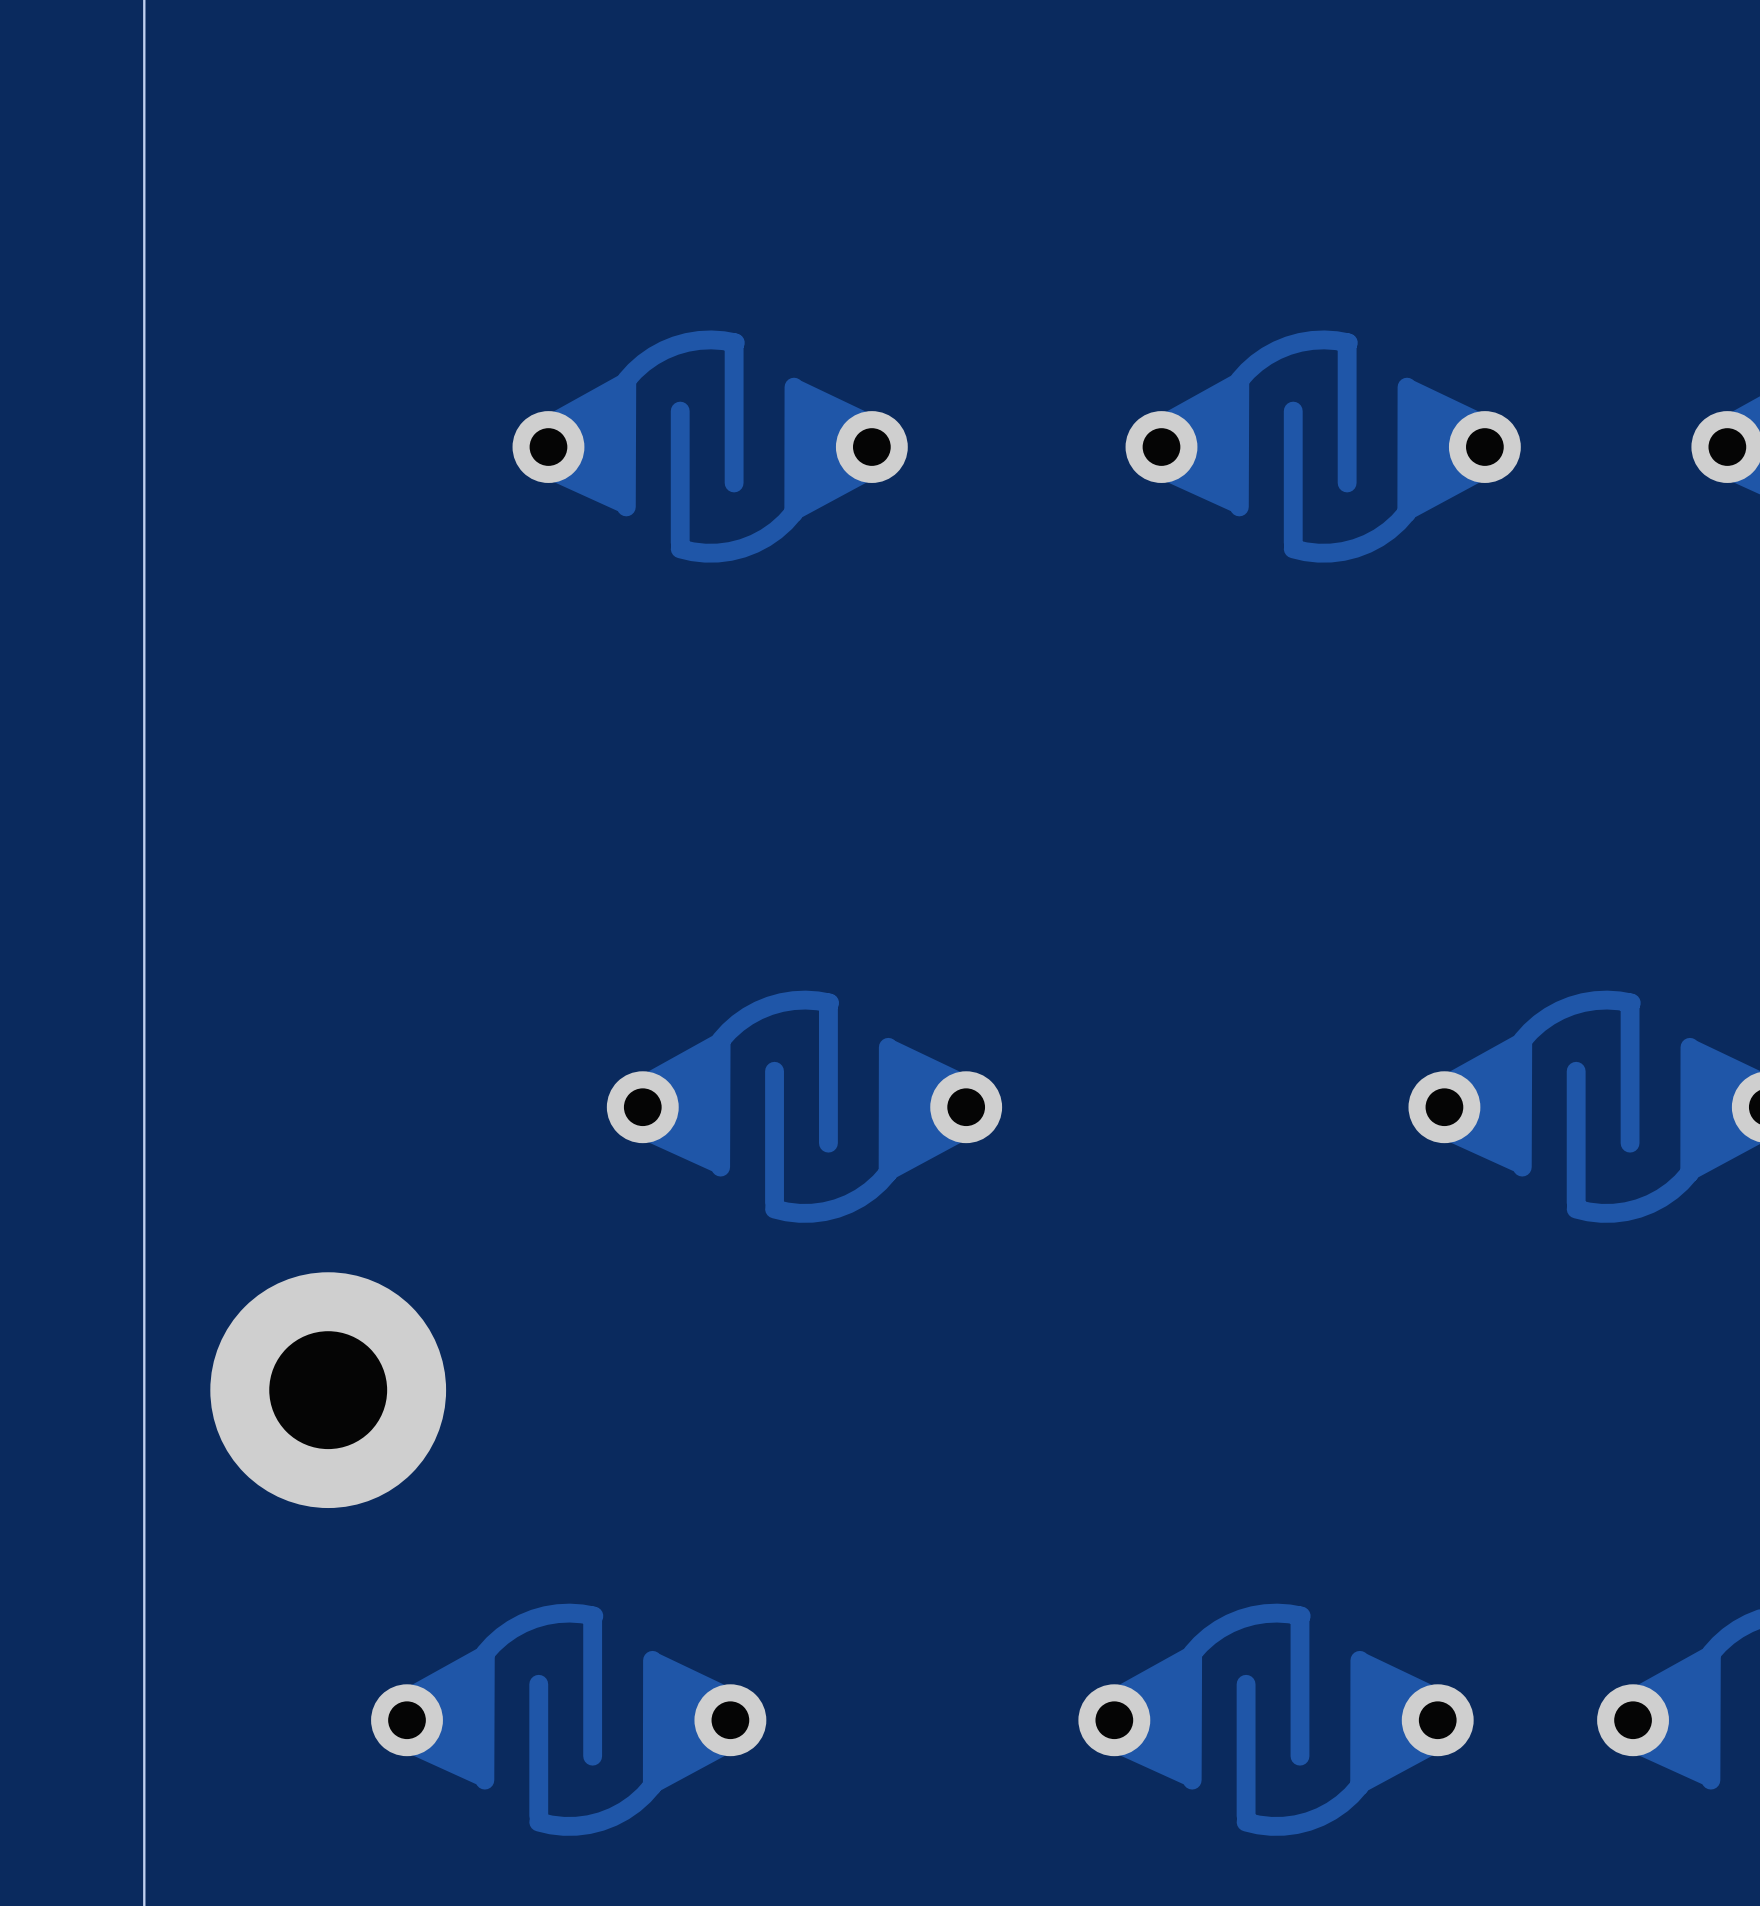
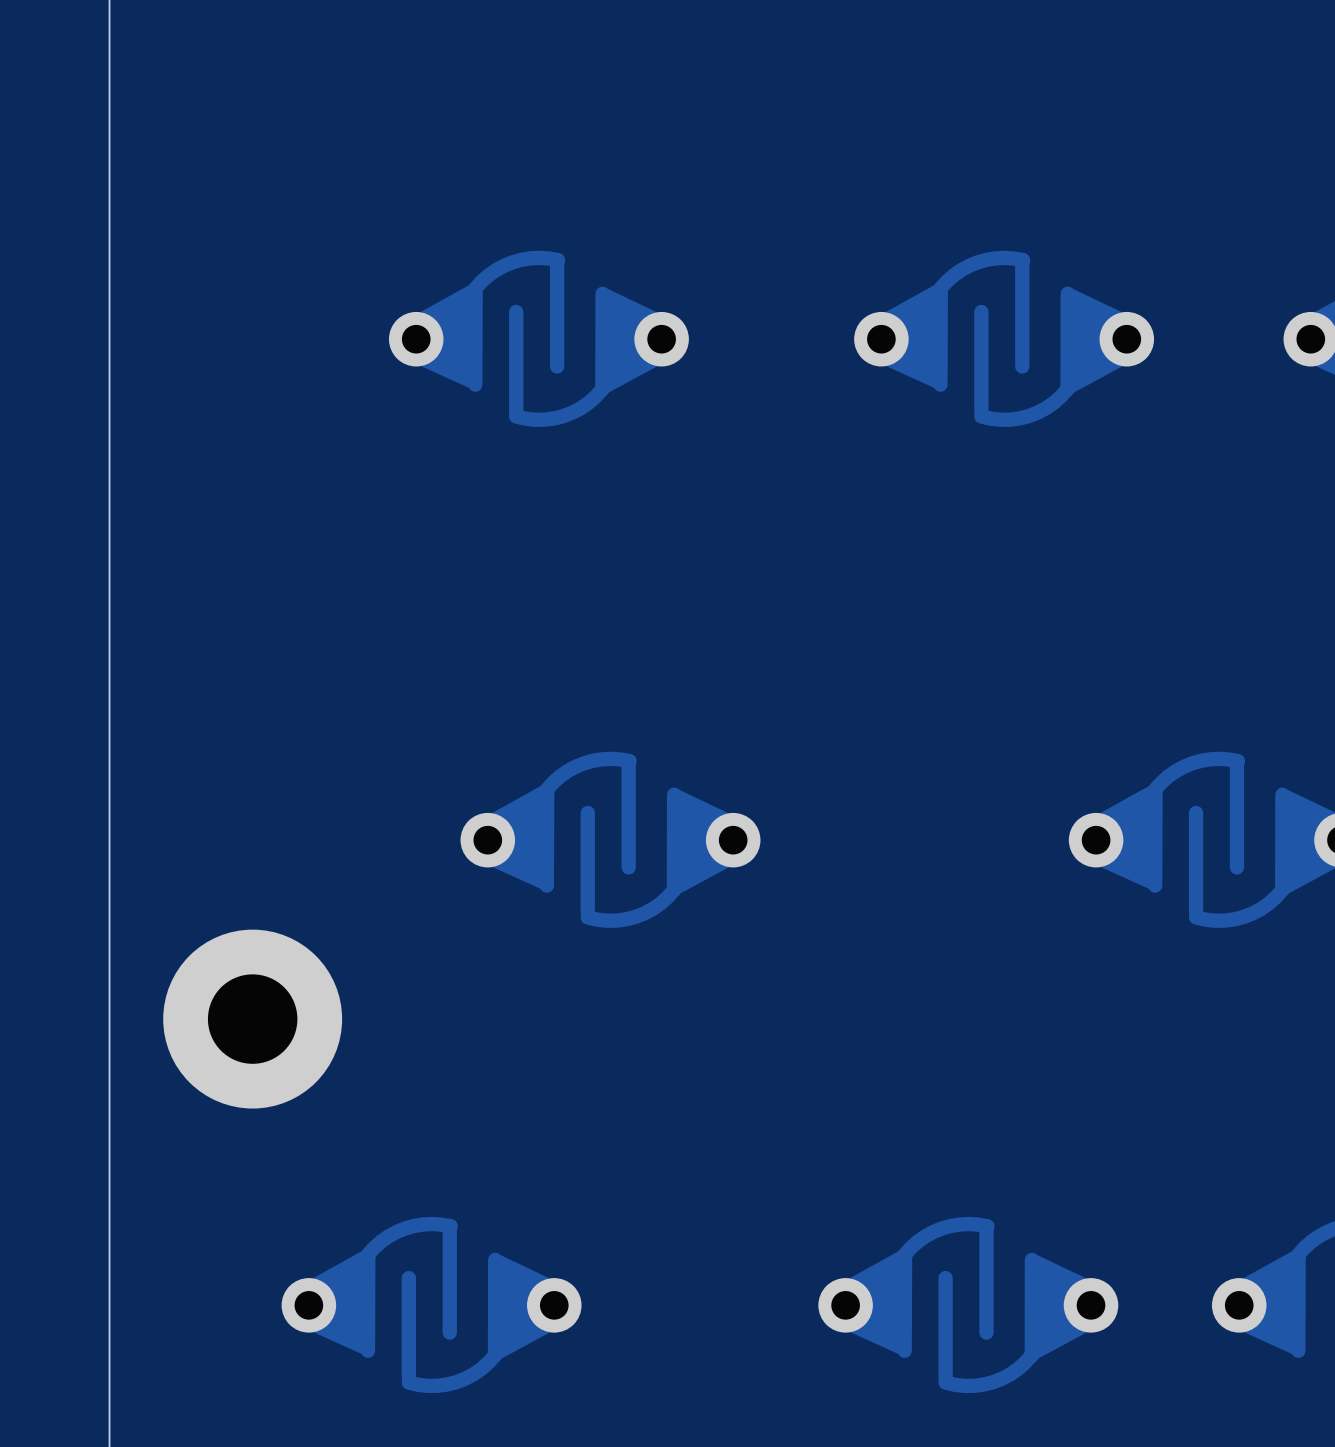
part position: (328, 1390) -> (252, 1019)

